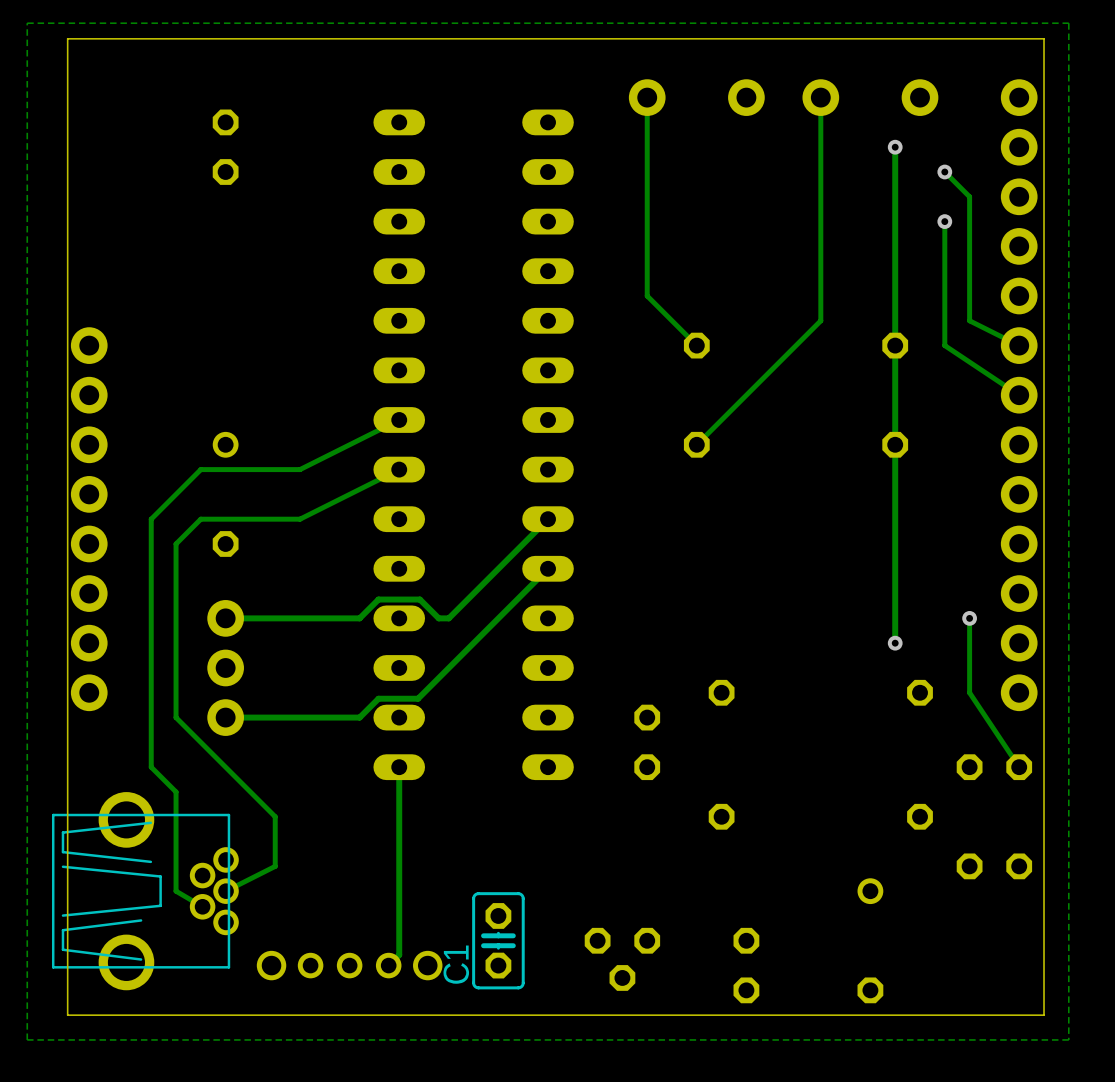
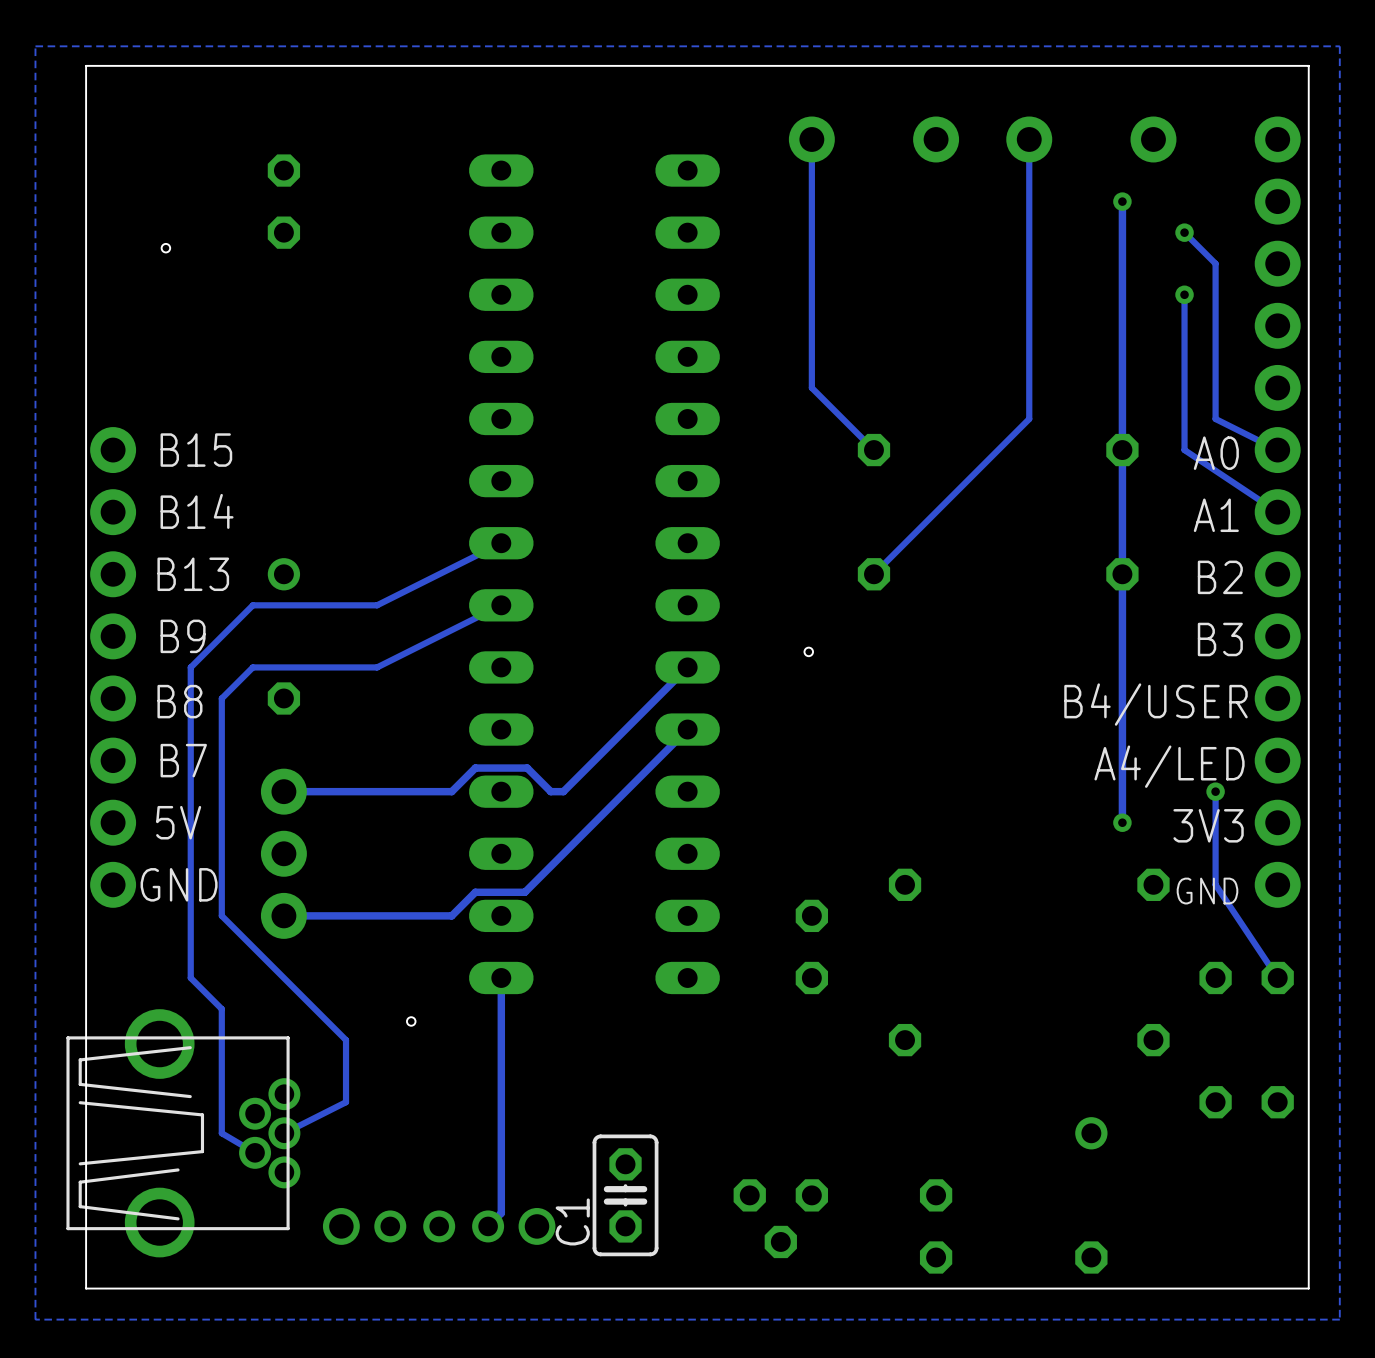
hole: none -> (165, 248)
text: none -> B15 (196, 450)
text: none -> A0 (1216, 453)
text: none -> B14 (197, 511)
text: none -> A1 (1216, 515)
text: none -> B13 (193, 574)
text: none -> B2 (1220, 577)
text: none -> B9 (183, 636)
text: none -> B3 (1220, 639)
hole: none -> (808, 651)
text: none -> B4/USER (1156, 704)
text: none -> B8 (179, 701)
text: none -> B7 (183, 760)
text: none -> A4/LED (1169, 766)
text: none -> 5V (178, 822)
text: none -> 3V3 (1208, 825)
text: none -> GND (179, 884)
text: none -> GND (1207, 891)
hole: none -> (411, 1021)

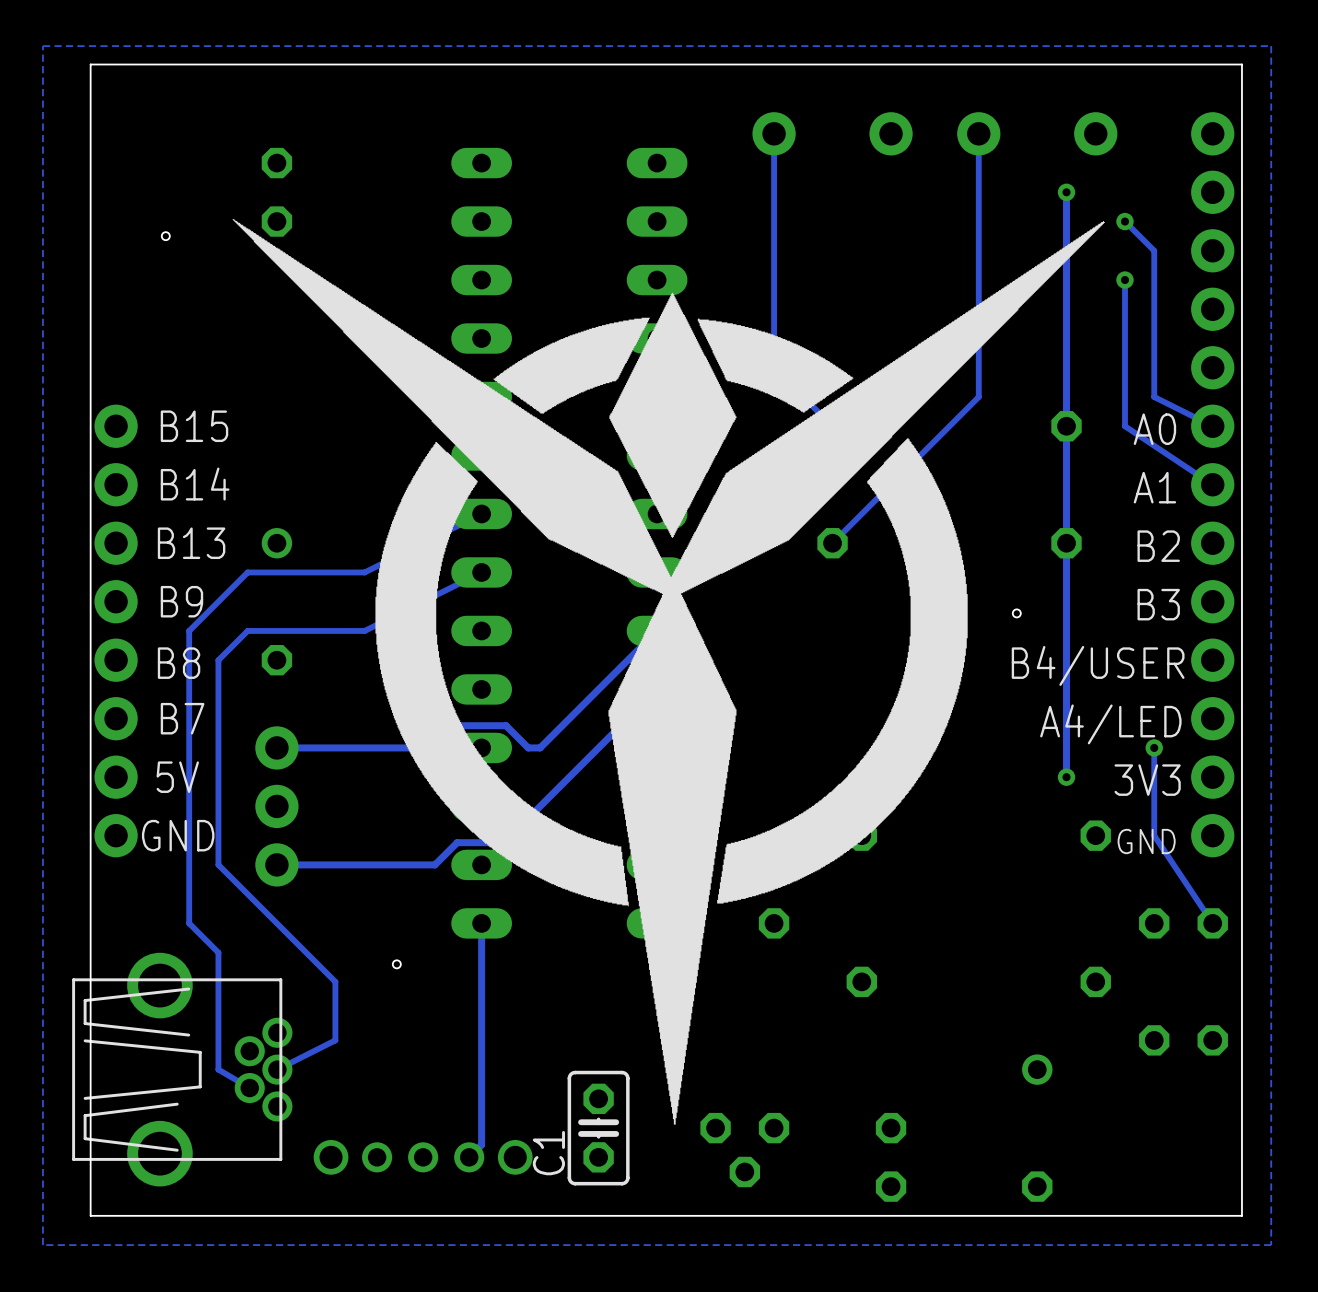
drawing: none -> [232, 219, 1105, 1125]
hole position: (808, 651) -> (1016, 613)

